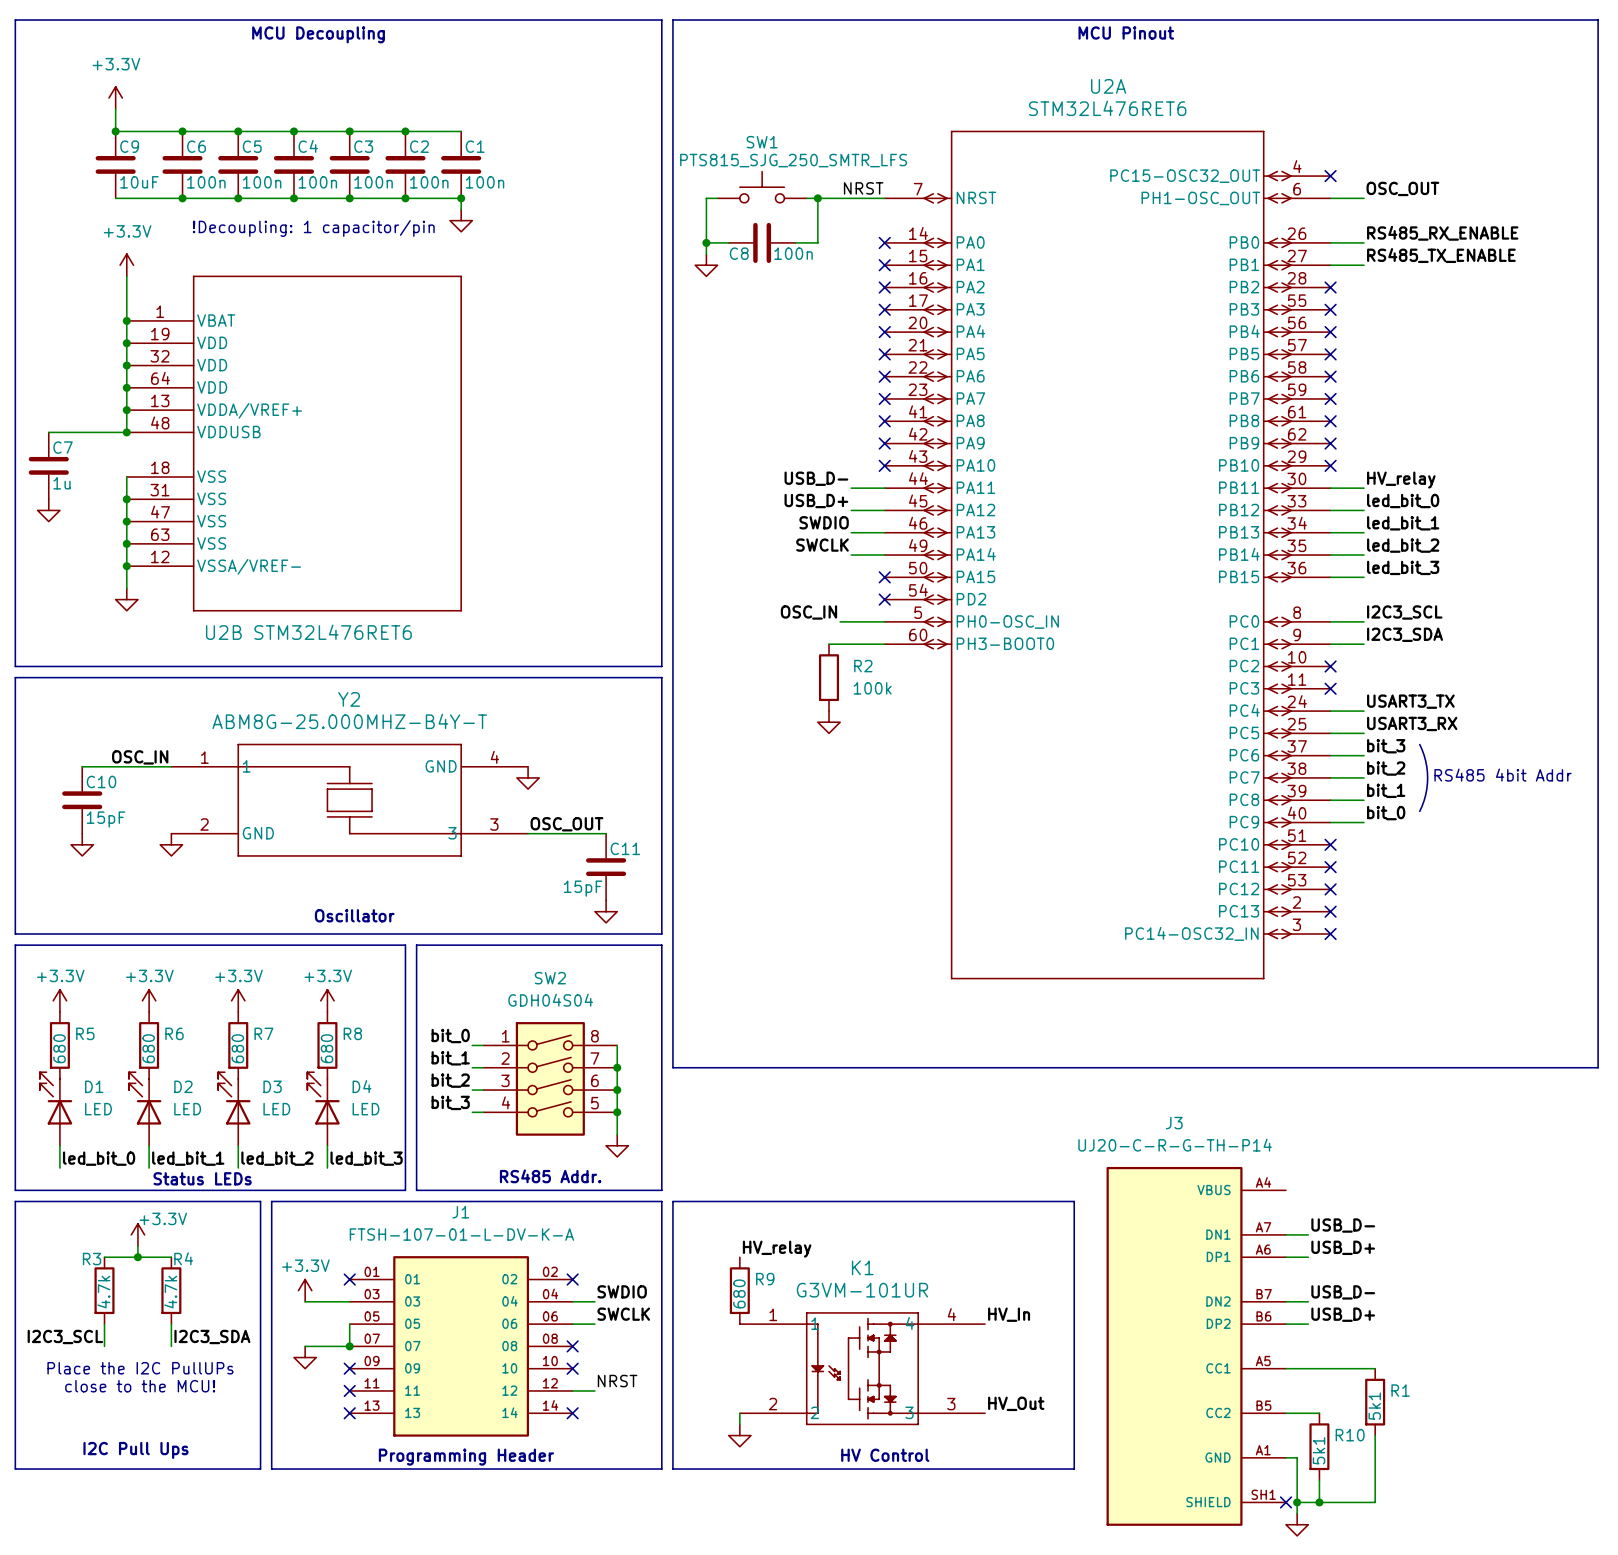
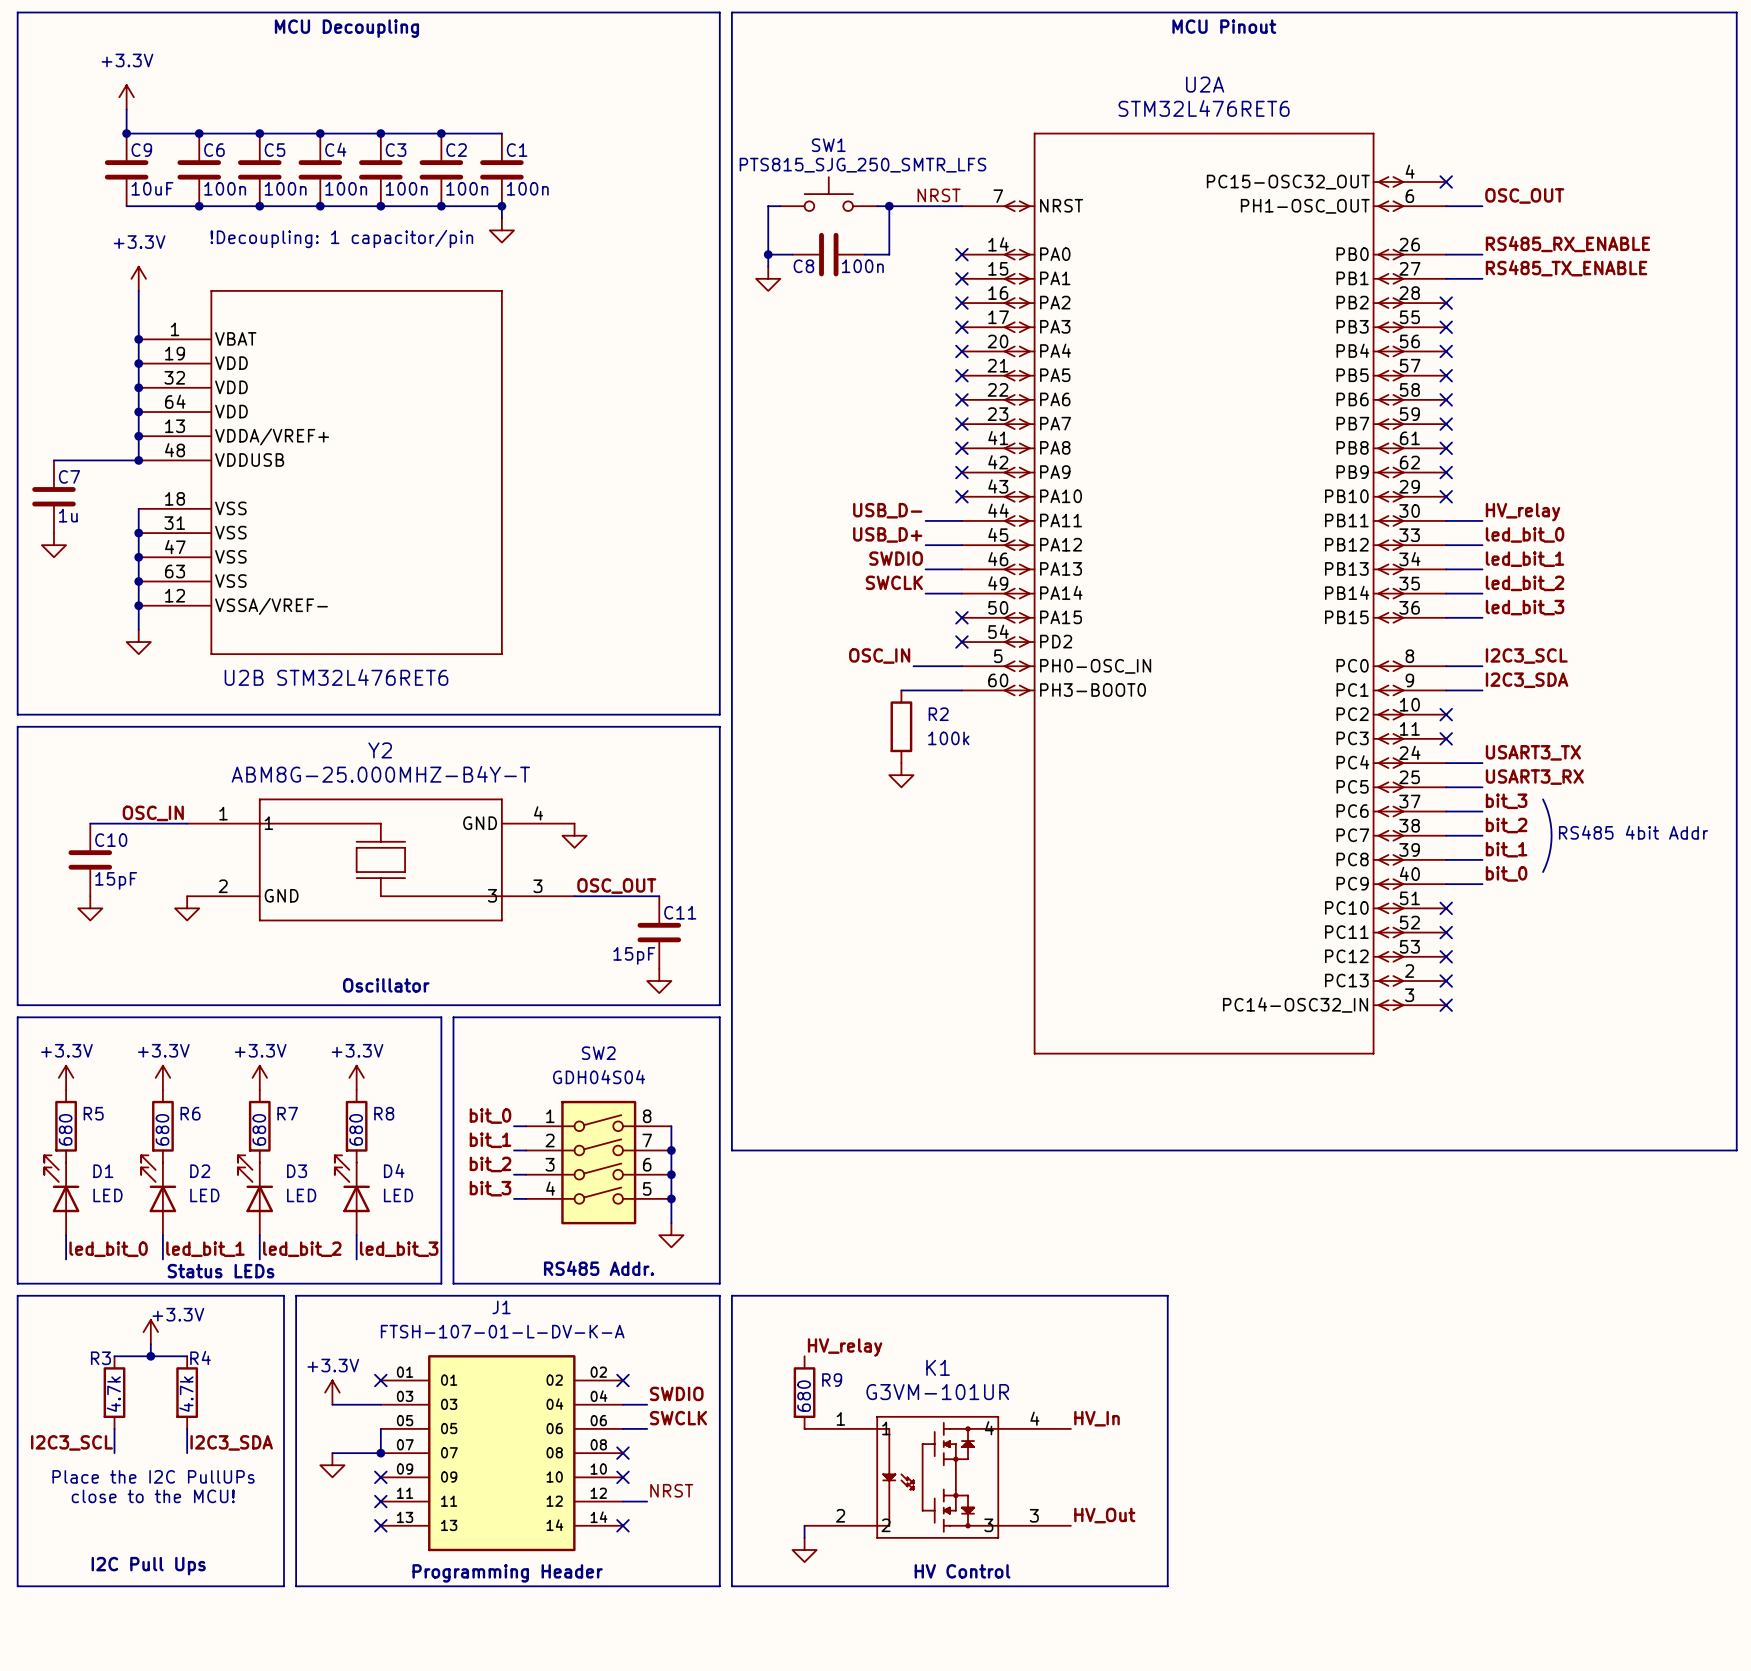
label: USB_D- (1343, 1225) -> none
wire: (1286, 1234) (1308, 1234) -> none
label: USB_D+ (1343, 1247) -> none
wire: (1286, 1257) (1308, 1257) -> none
label: USB_D- (1343, 1292) -> none
wire: (1286, 1301) (1308, 1301) -> none
label: USB_D+ (1343, 1314) -> none
wire: (1286, 1324) (1308, 1324) -> none
J3: UJ20-C-R-G-TH-P14 (1196, 1346) -> none
wire: (1286, 1368) (1375, 1368) -> none
R1: 5k1 (1375, 1402) -> none
wire: (1286, 1413) (1319, 1413) -> none
wire: (1375, 1435) (1375, 1502) (1297, 1502) -> none
R10: 5k1 (1319, 1446) -> none
wire: (1286, 1457) (1297, 1457) (1297, 1513) -> none
wire: (1319, 1480) (1319, 1502) -> none
no-connect mark: (1286, 1502) -> none
junction: (1297, 1502) -> none
junction: (1319, 1502) -> none
power symbol: (1297, 1524) -> none

